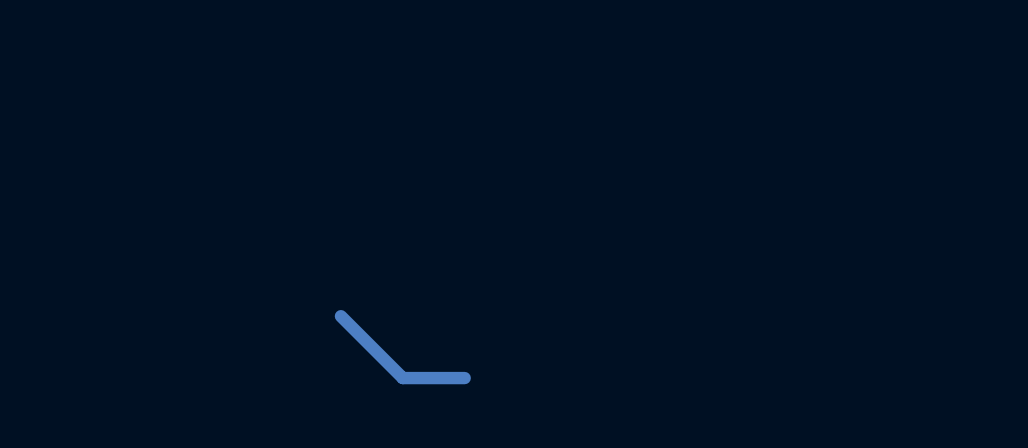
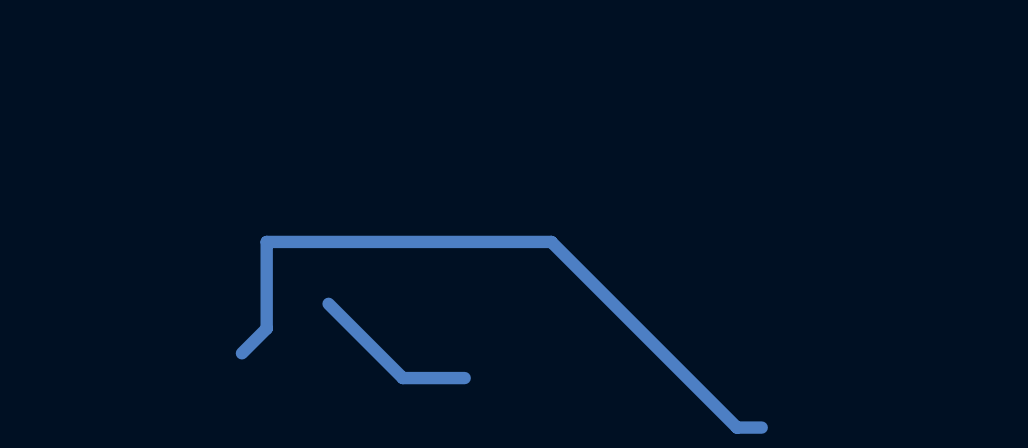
track: none -> (328, 303) (340, 316)
track: none -> (241, 353) (266, 328) (266, 241) (551, 241) (736, 427) (761, 427)

